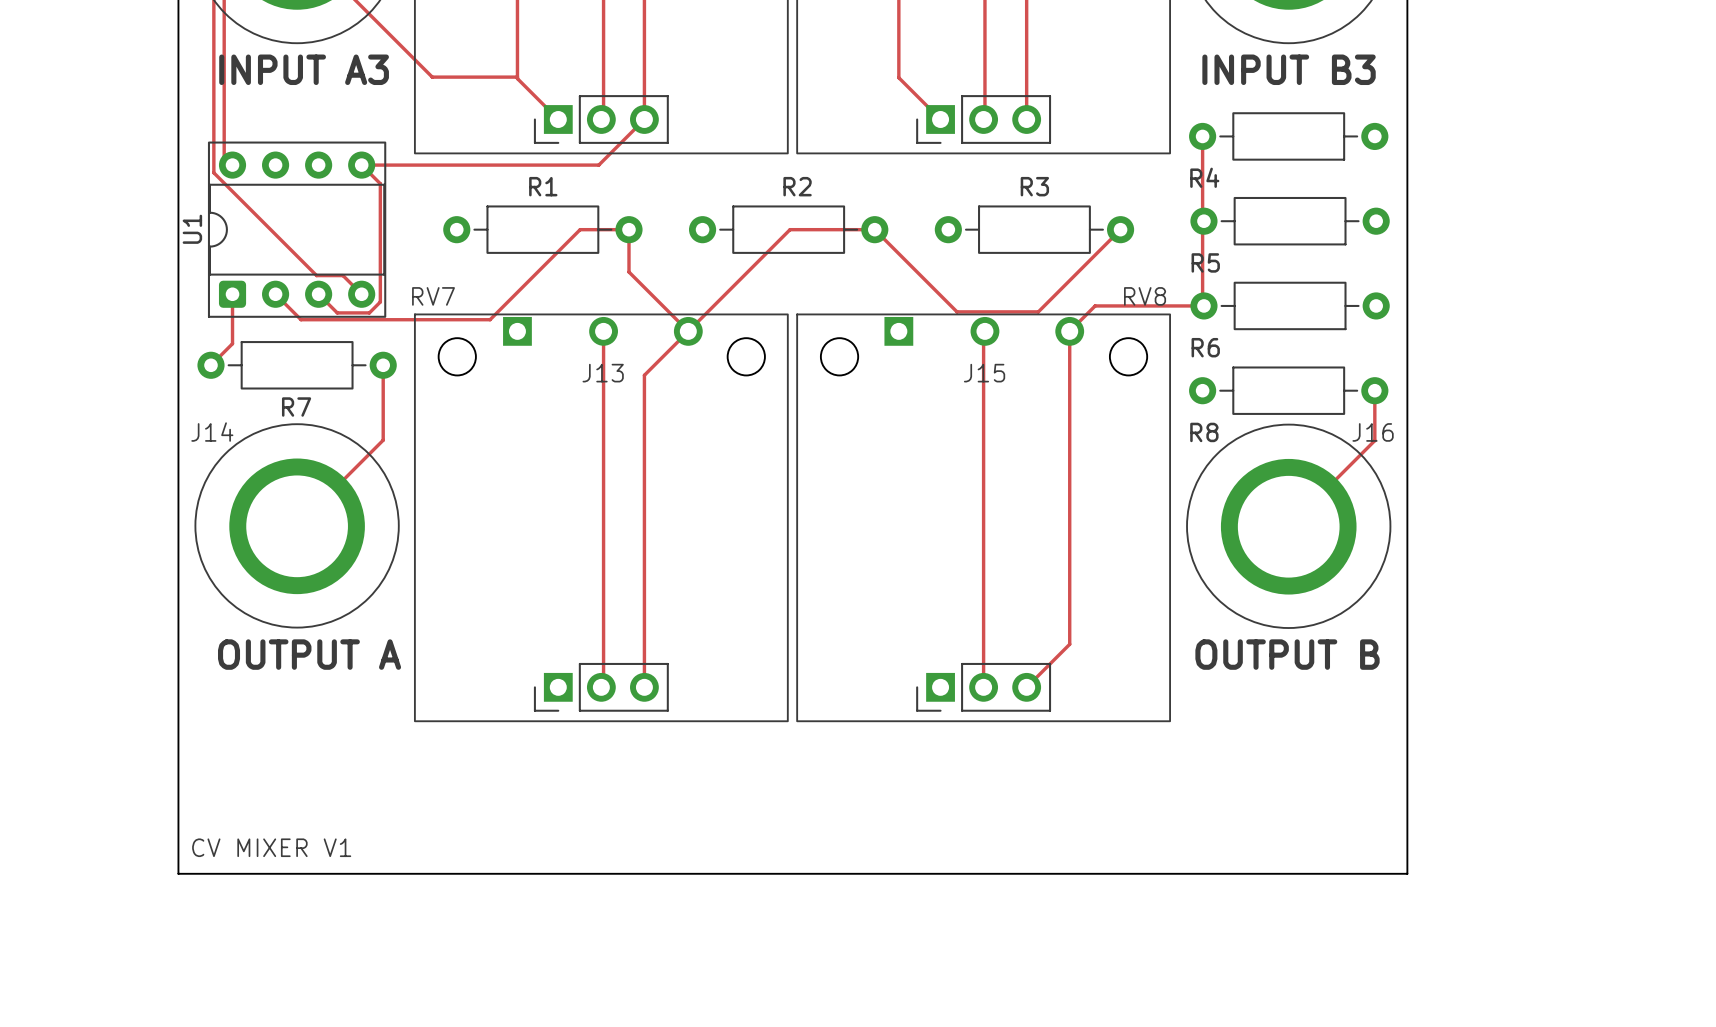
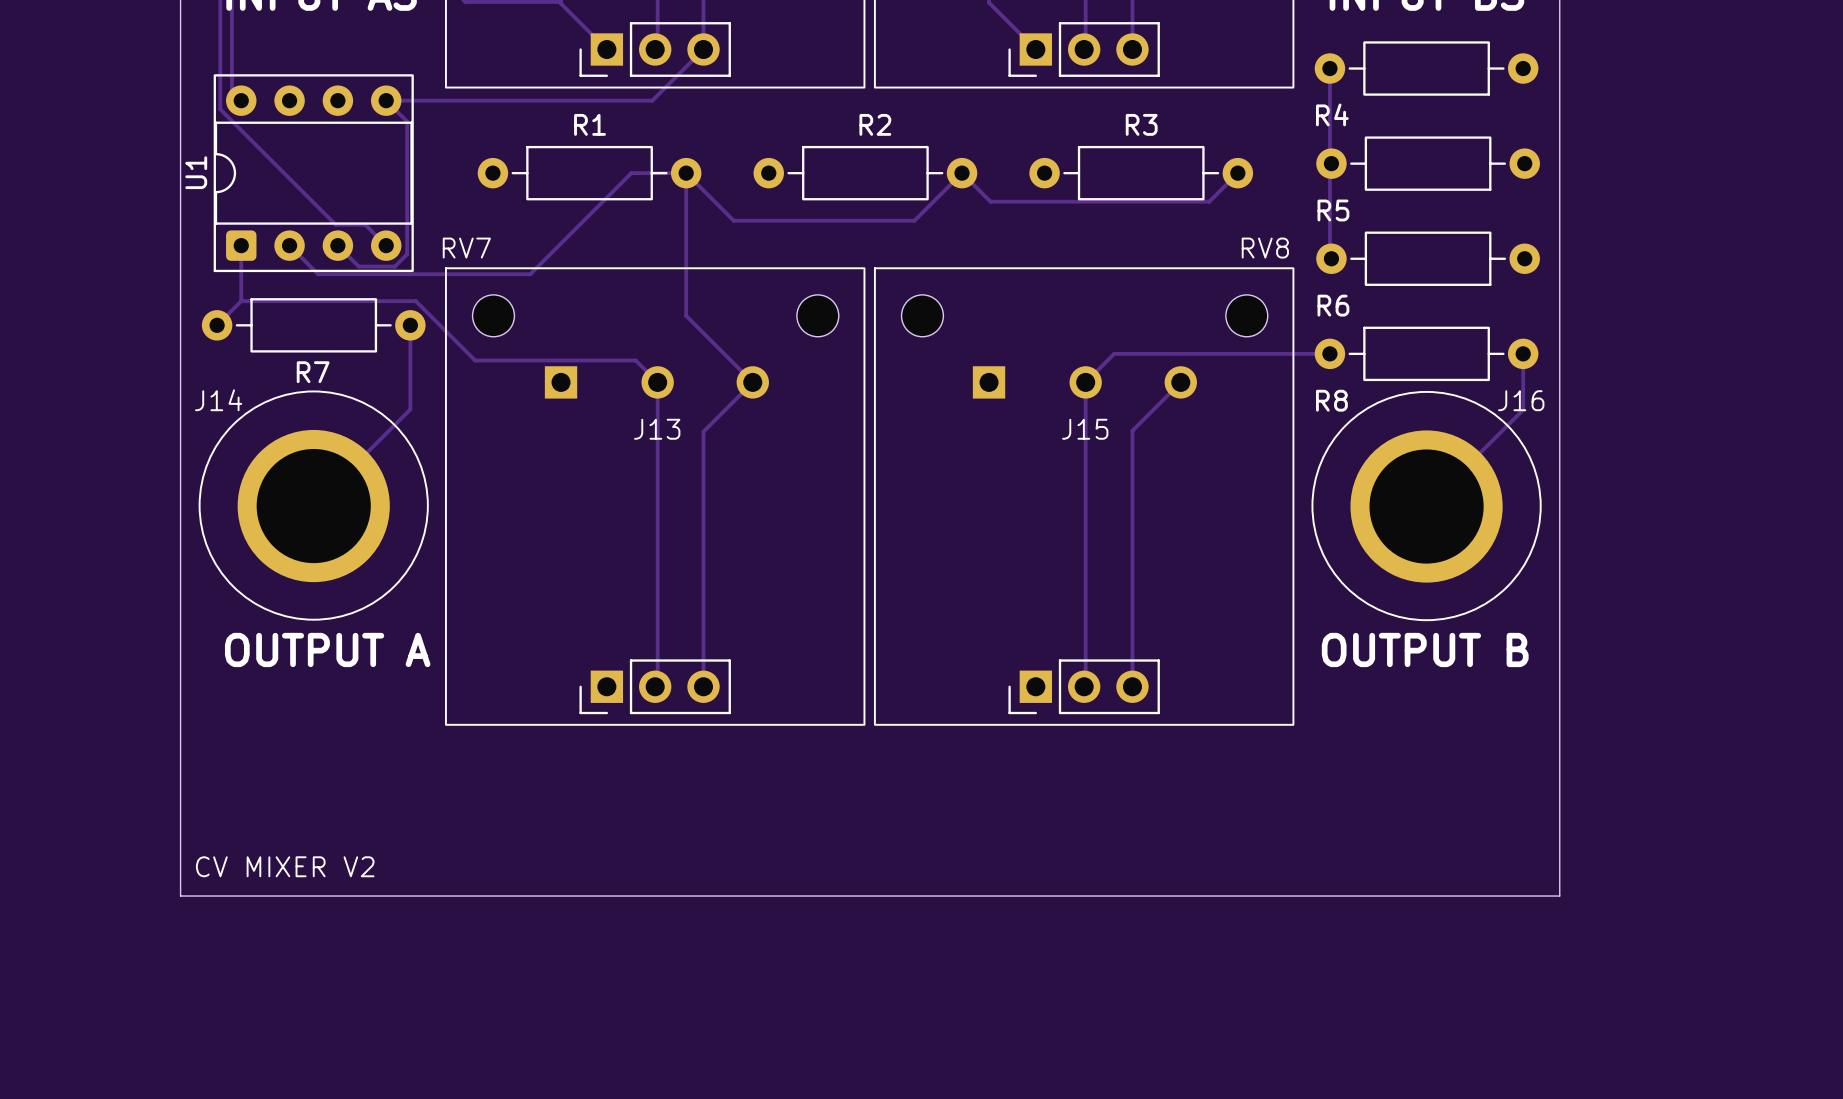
track: (874, 229) (790, 229) (644, 375) (644, 460) -> (962, 173) (914, 220) (733, 220) (686, 173)
track: (900, 255) (956, 311) (1038, 311) (1095, 255) -> (990, 201) (1209, 201)
track: (629, 272) (688, 331) -> (686, 220) (686, 315) (752, 382) (703, 431)
track: (1203, 305) (1095, 305) (1069, 331) (1069, 644) (1026, 687) -> (1180, 382) (1132, 430) (1132, 686)
J13 position: (602, 331) -> (656, 382)
track: (603, 331) (603, 416) -> (241, 301) (415, 301) (475, 360) (635, 360) (657, 382)
track: (984, 331) (983, 687) -> (1329, 353) (1114, 353) (1085, 382) (1085, 685) (1084, 686)
J15 position: (984, 331) -> (1084, 382)
text: CV MIXER V1 (271, 847) -> CV MIXER V2 (285, 866)

